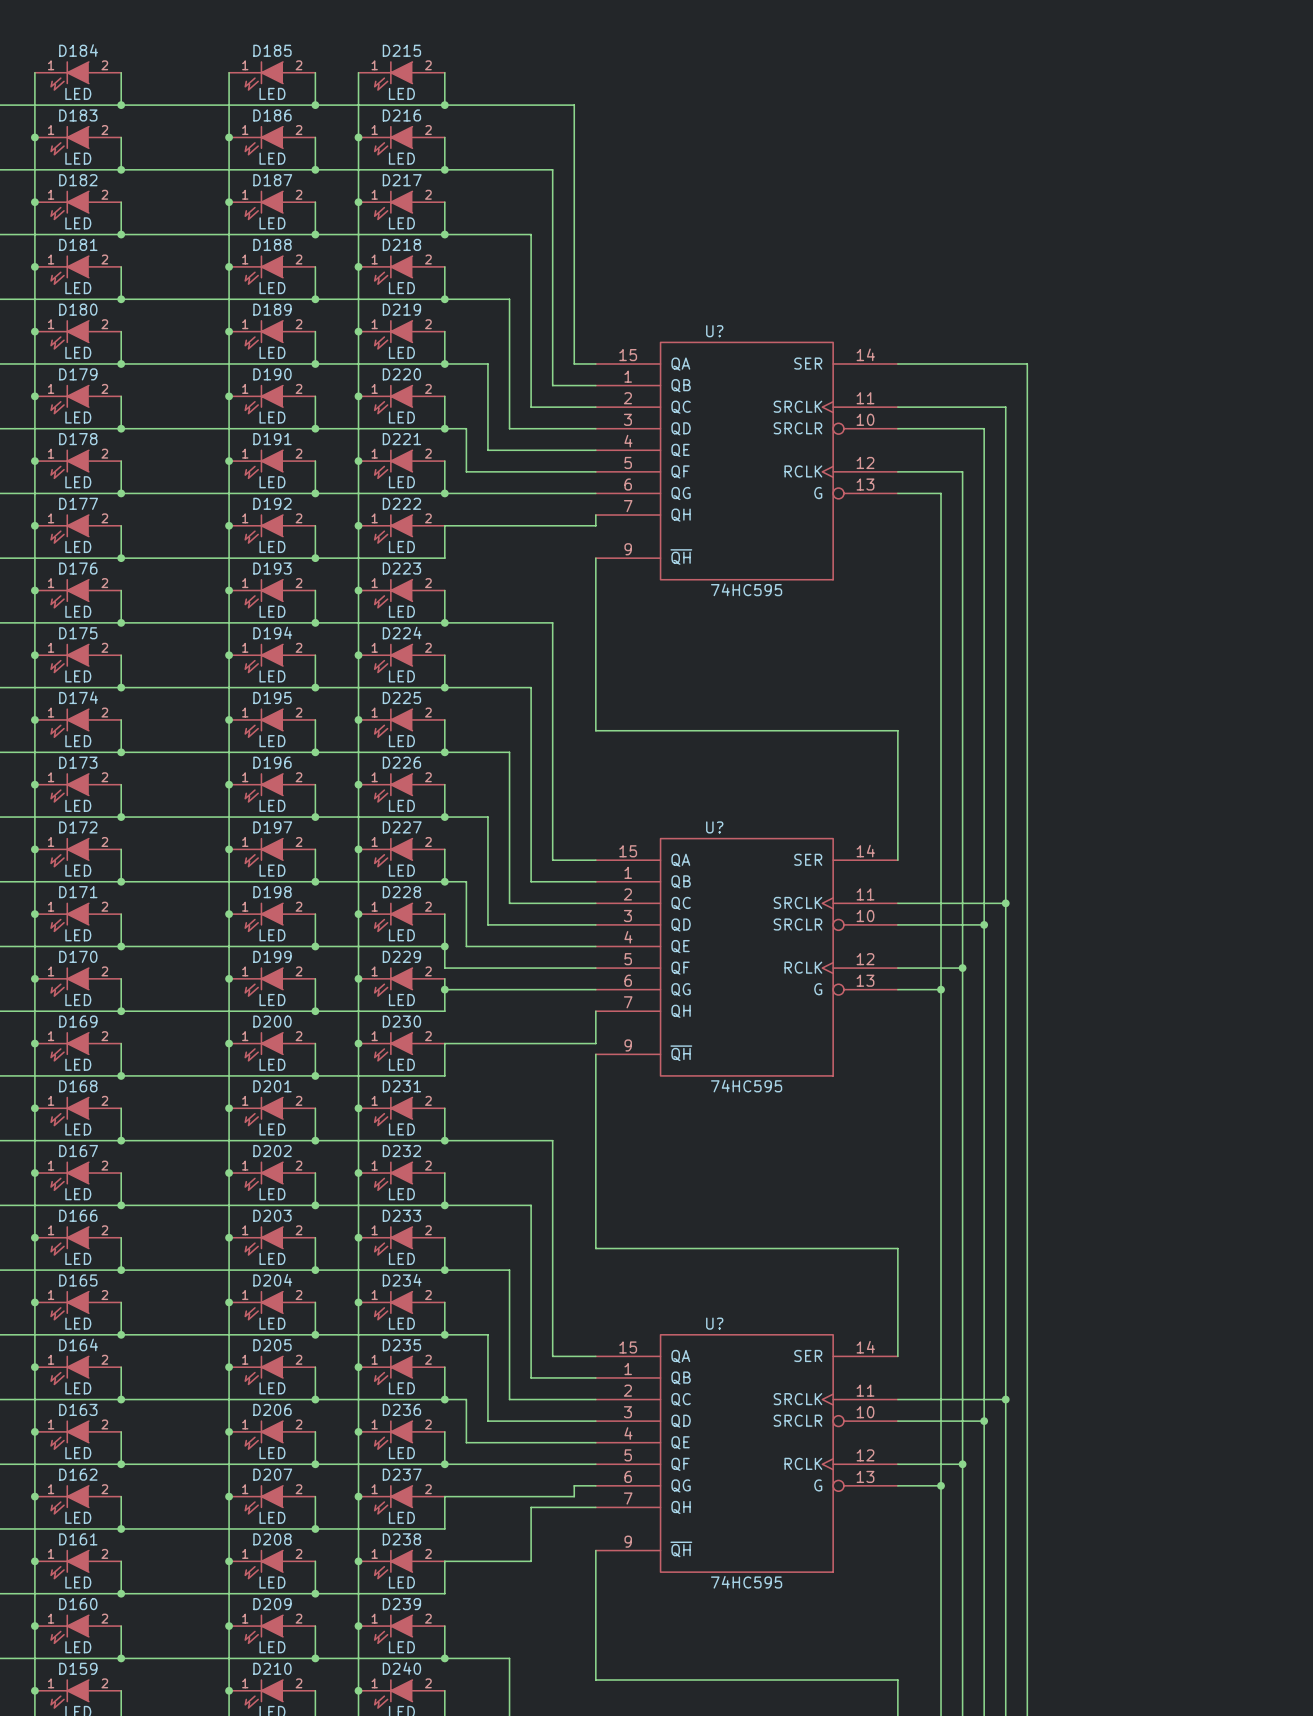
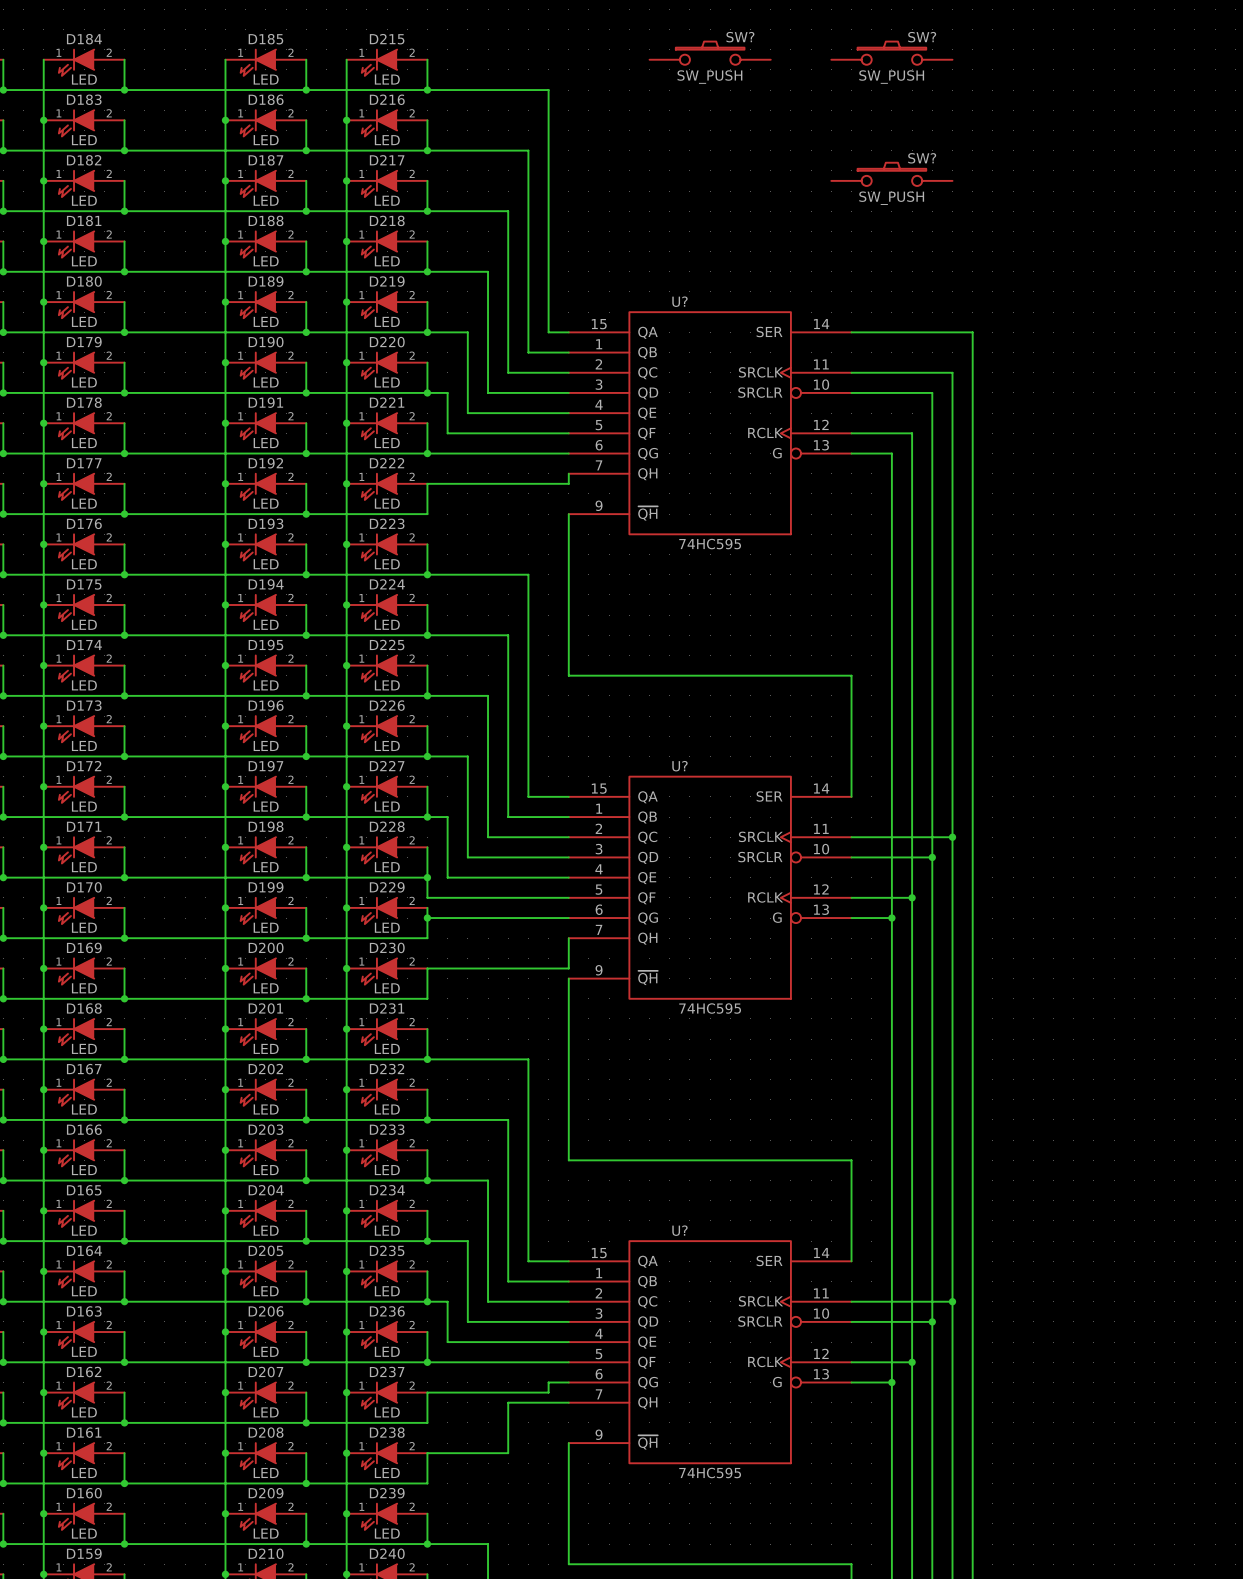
SW?: none -> SW_PUSH (710, 53)
SW?: none -> SW_PUSH (891, 53)
SW?: none -> SW_PUSH (891, 174)

